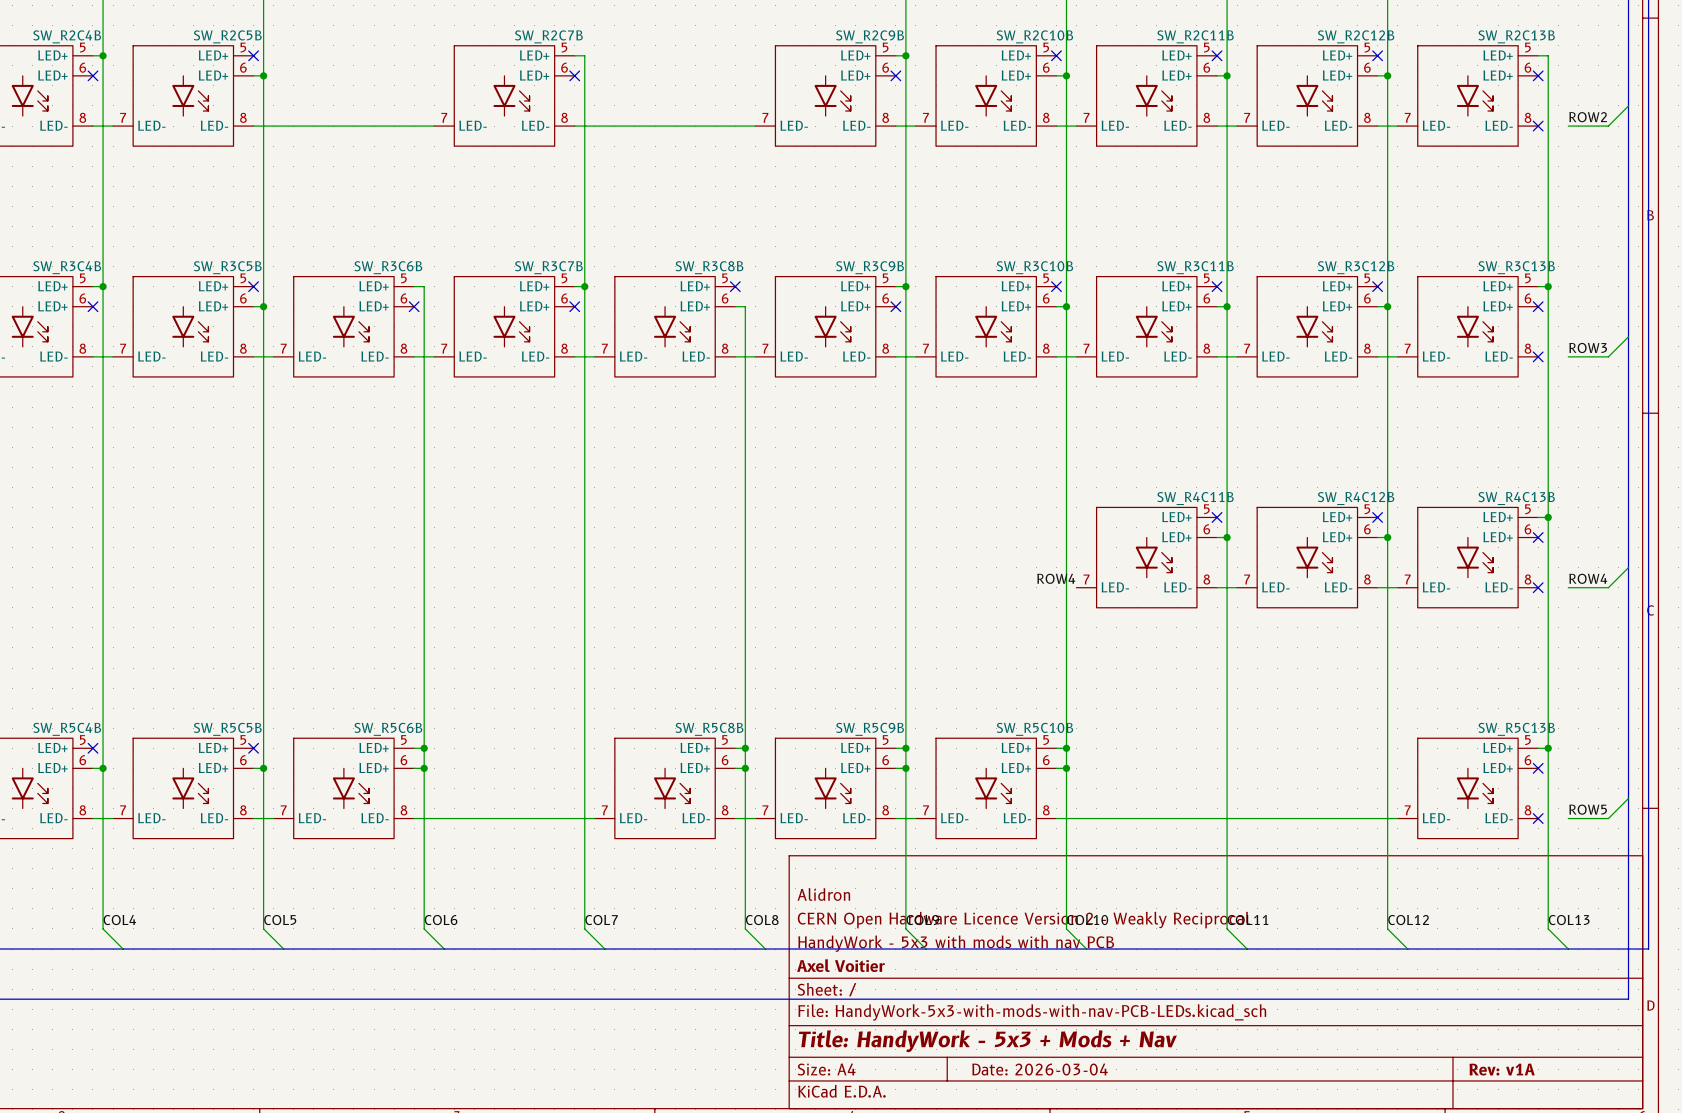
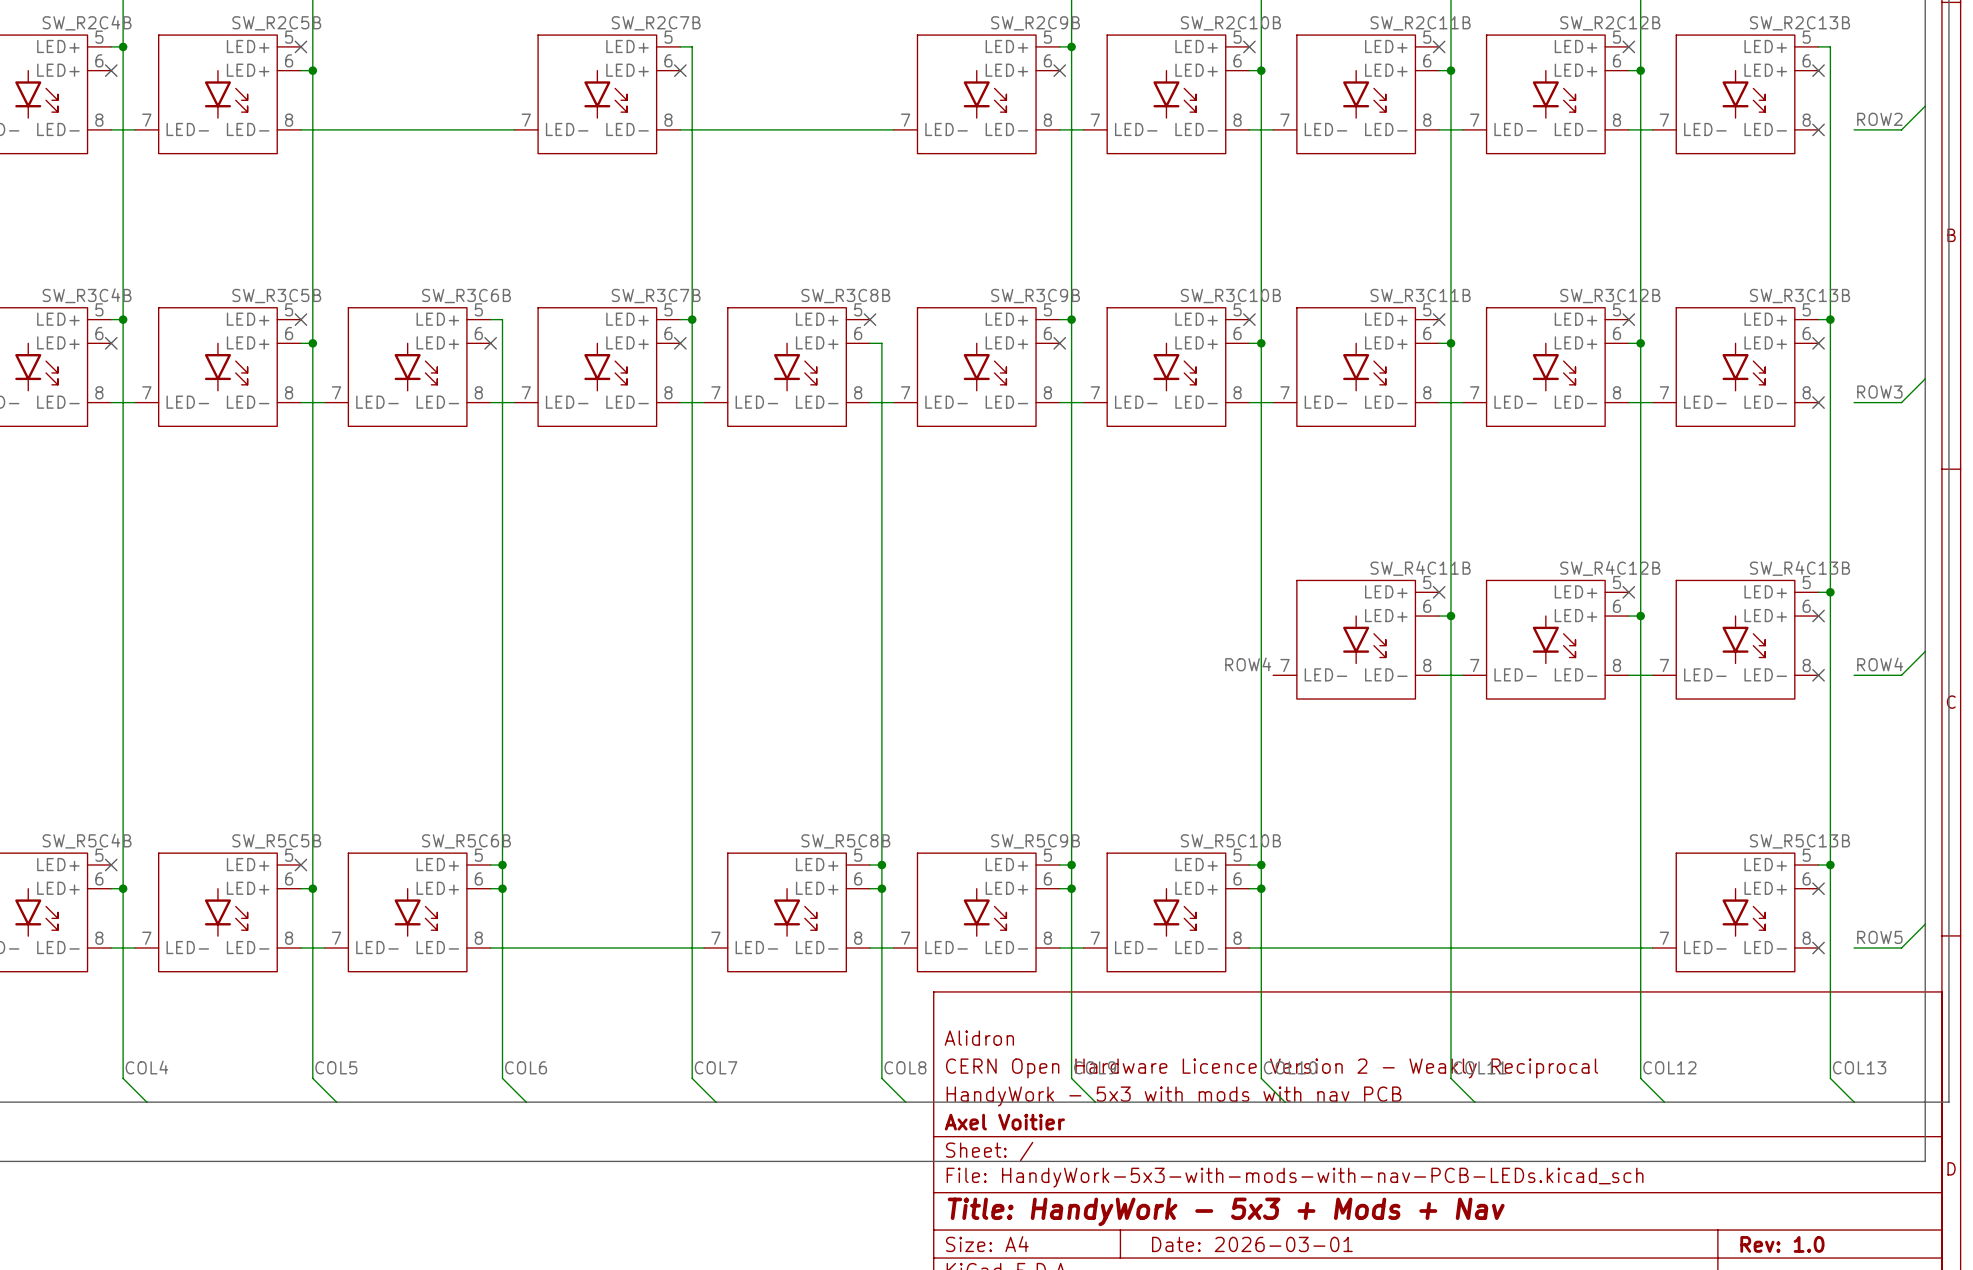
title block: Date: 2026-03-04 (1040, 1069) -> Date: 2026-03-01 (1252, 1244)
title block: Rev: v1A (1502, 1069) -> Rev: 1.0 (1782, 1244)

